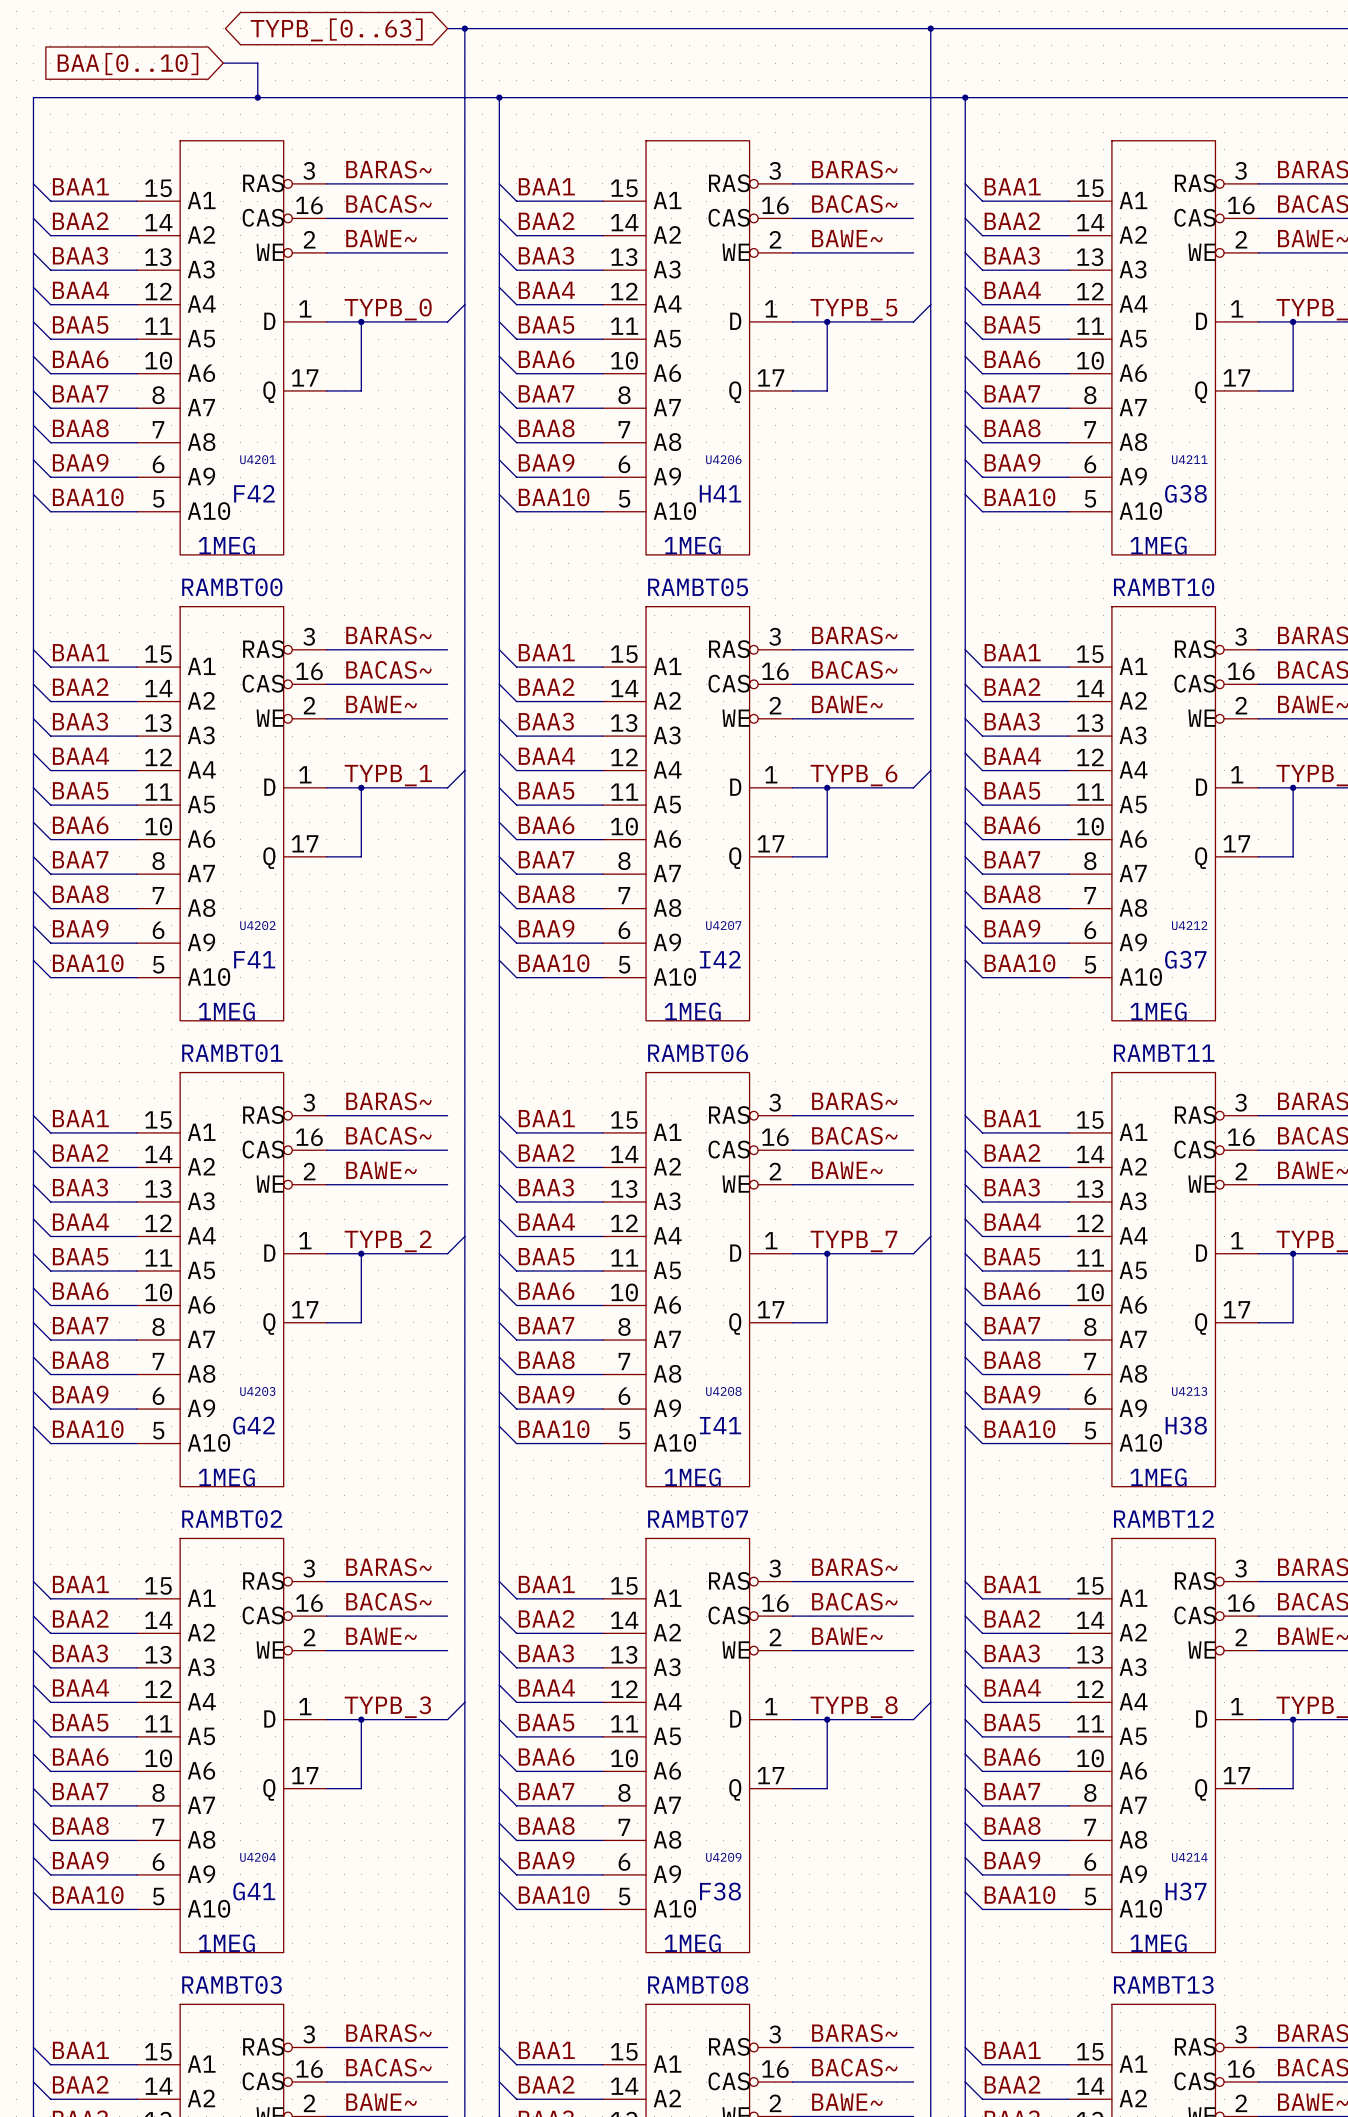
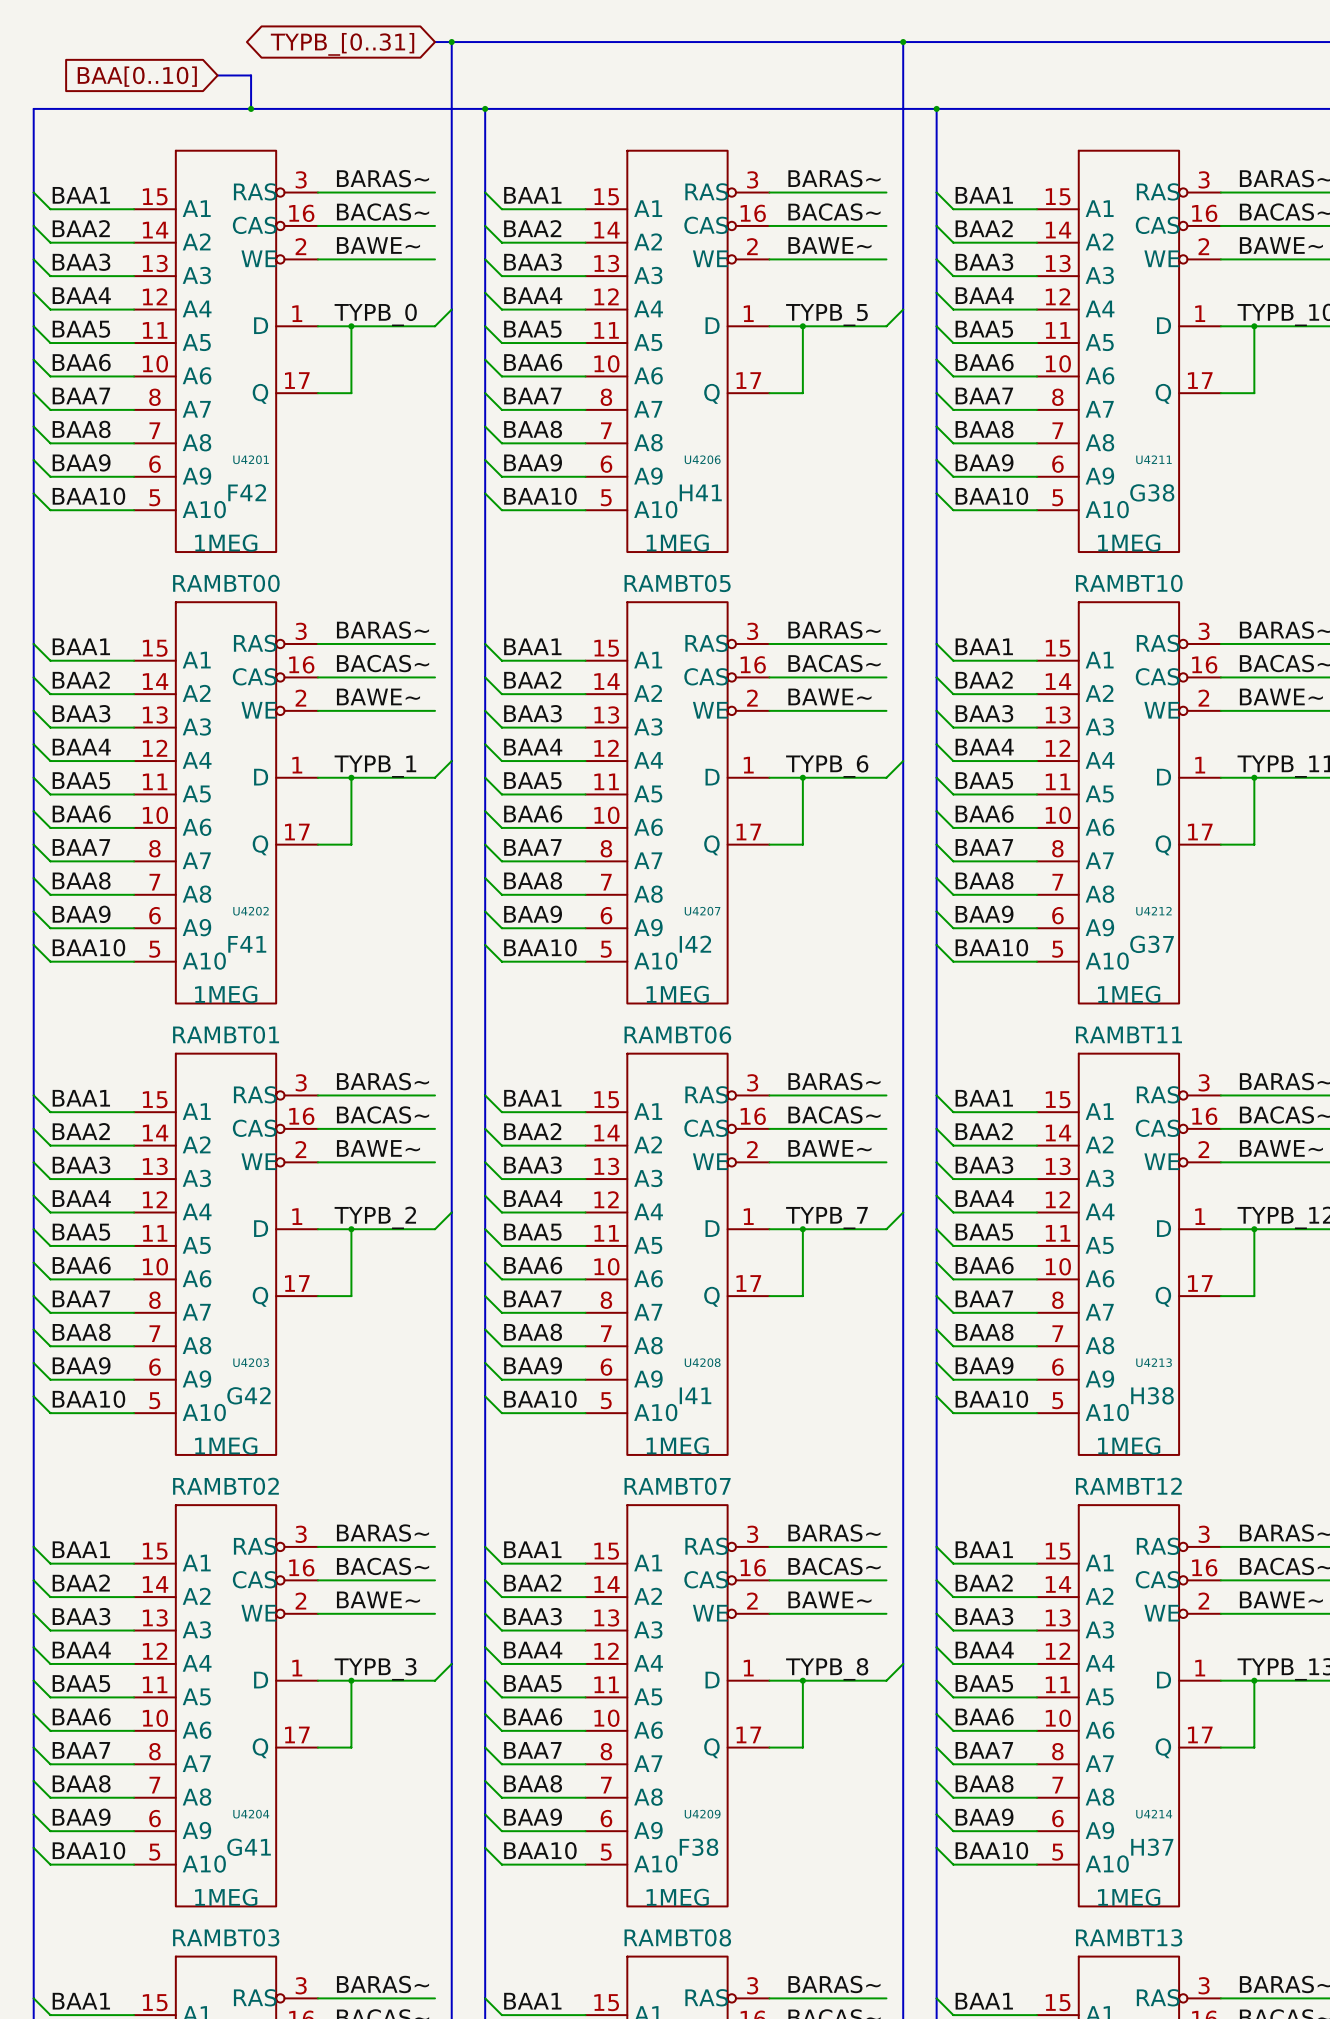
global label: TYPB_[0..63] (336, 29) -> TYPB_[0..31] (342, 44)

